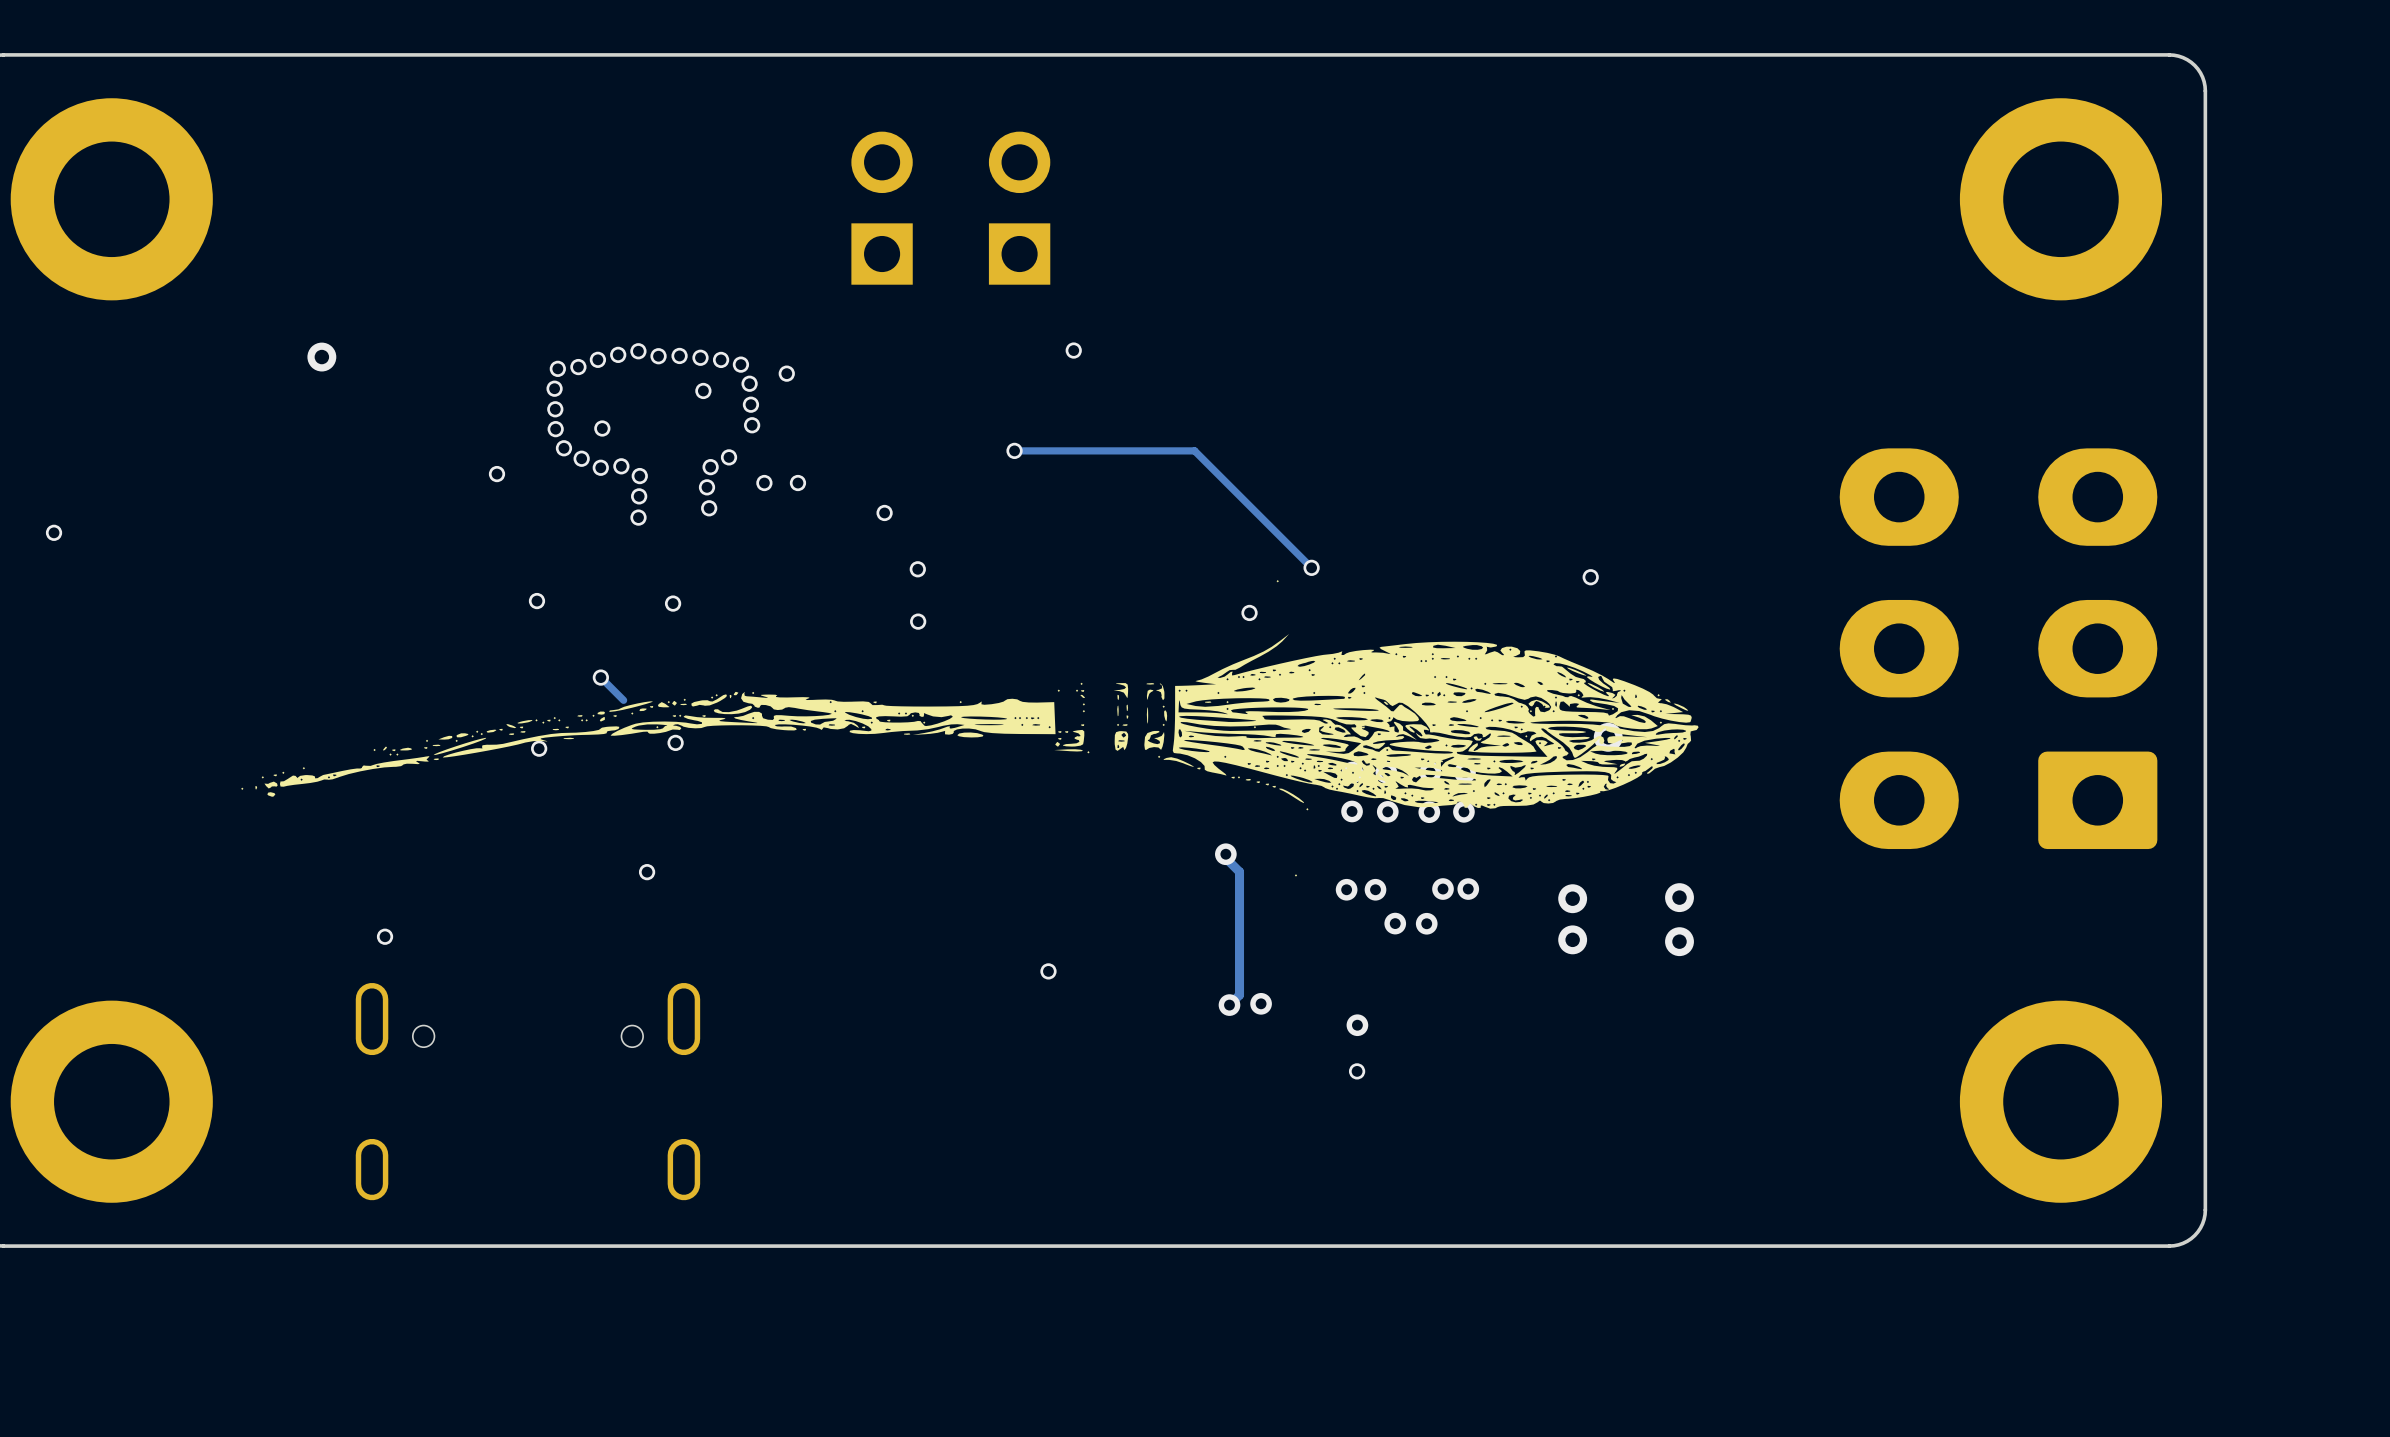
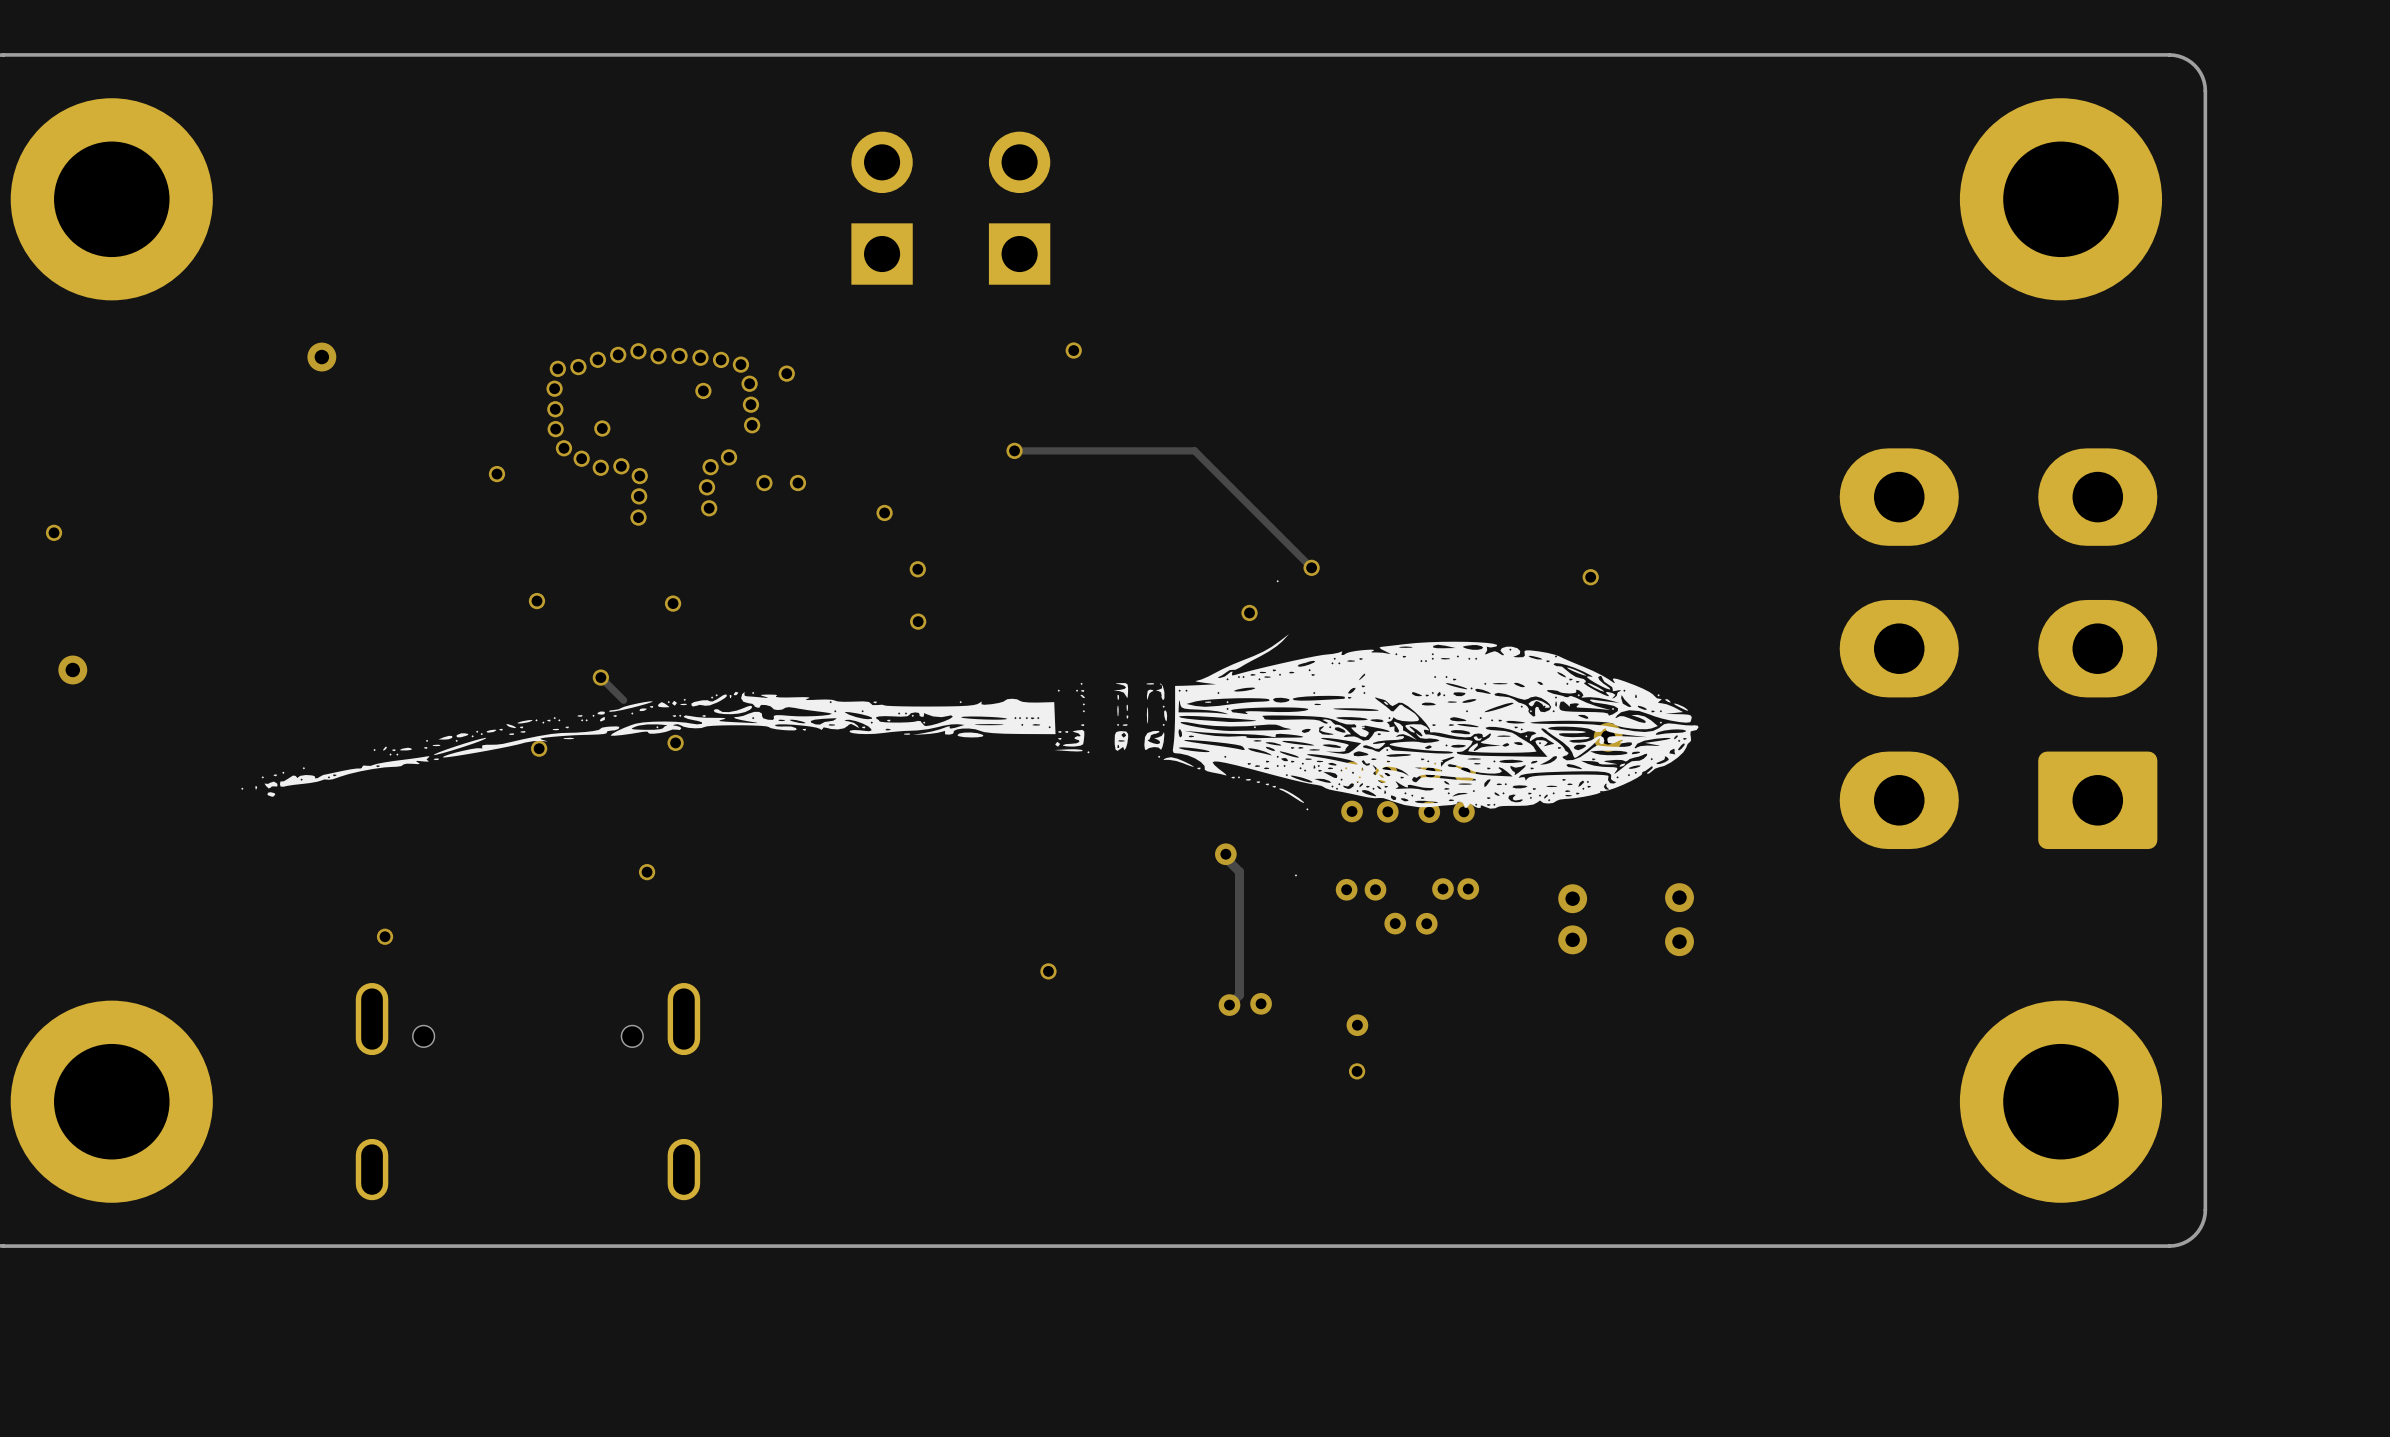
via: none -> (72, 669)

